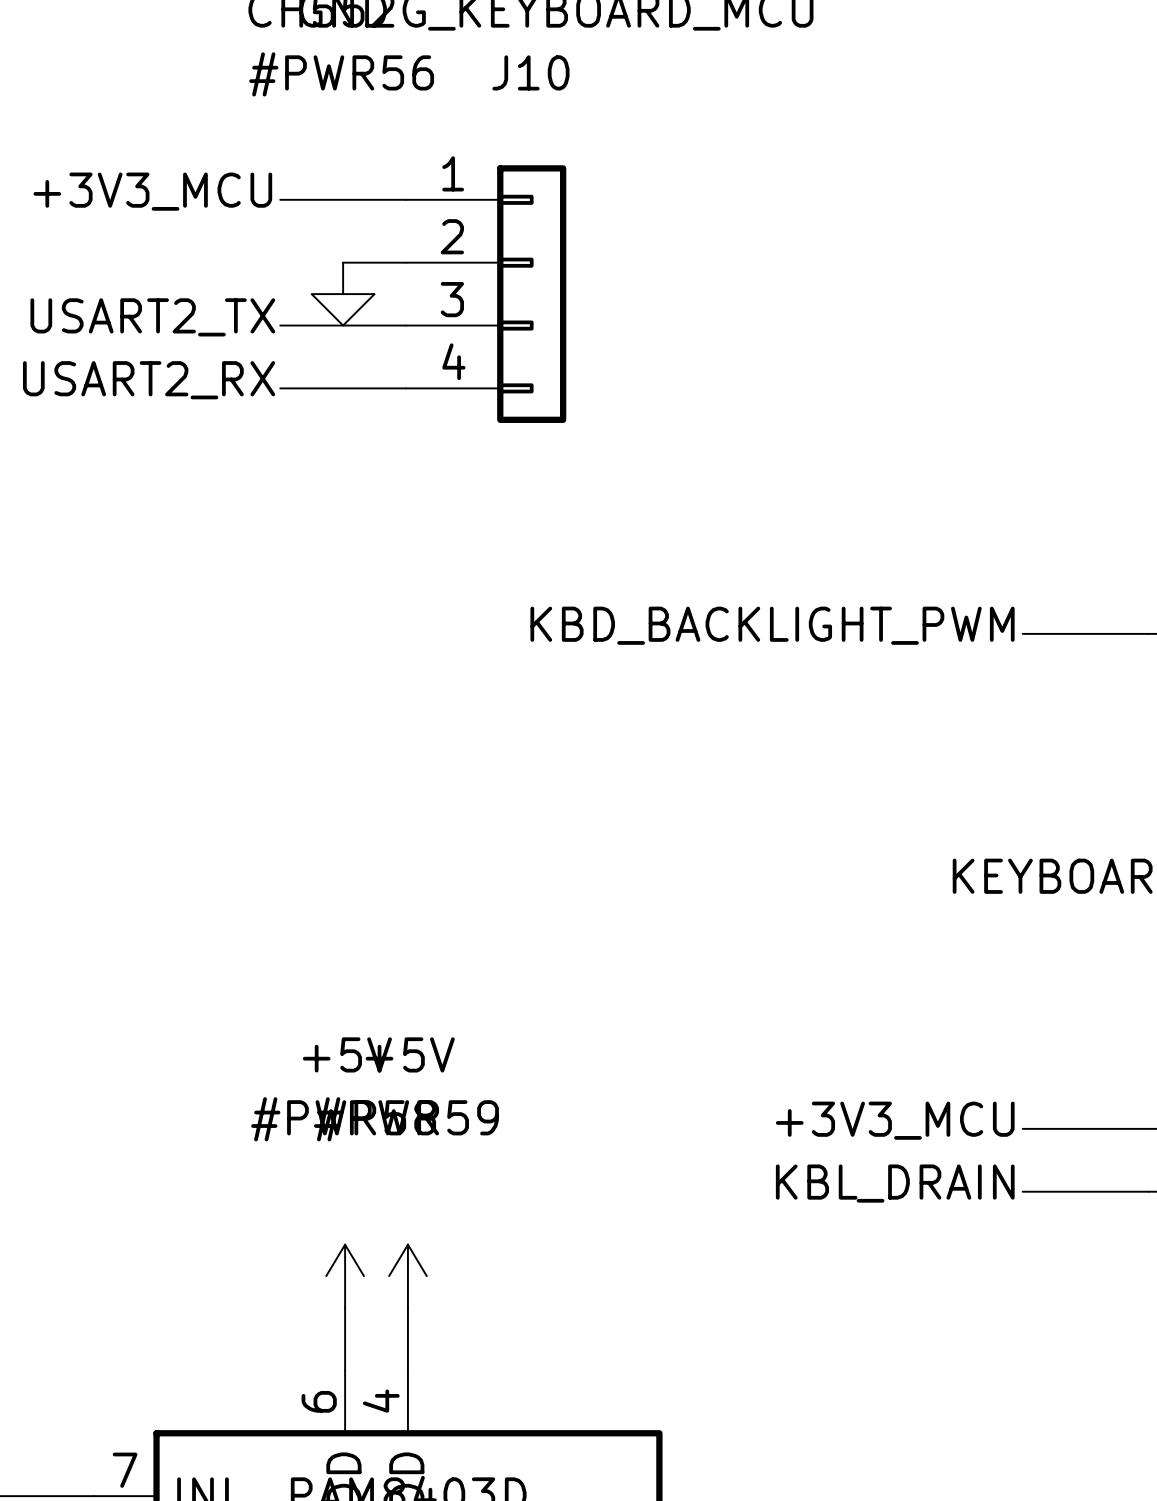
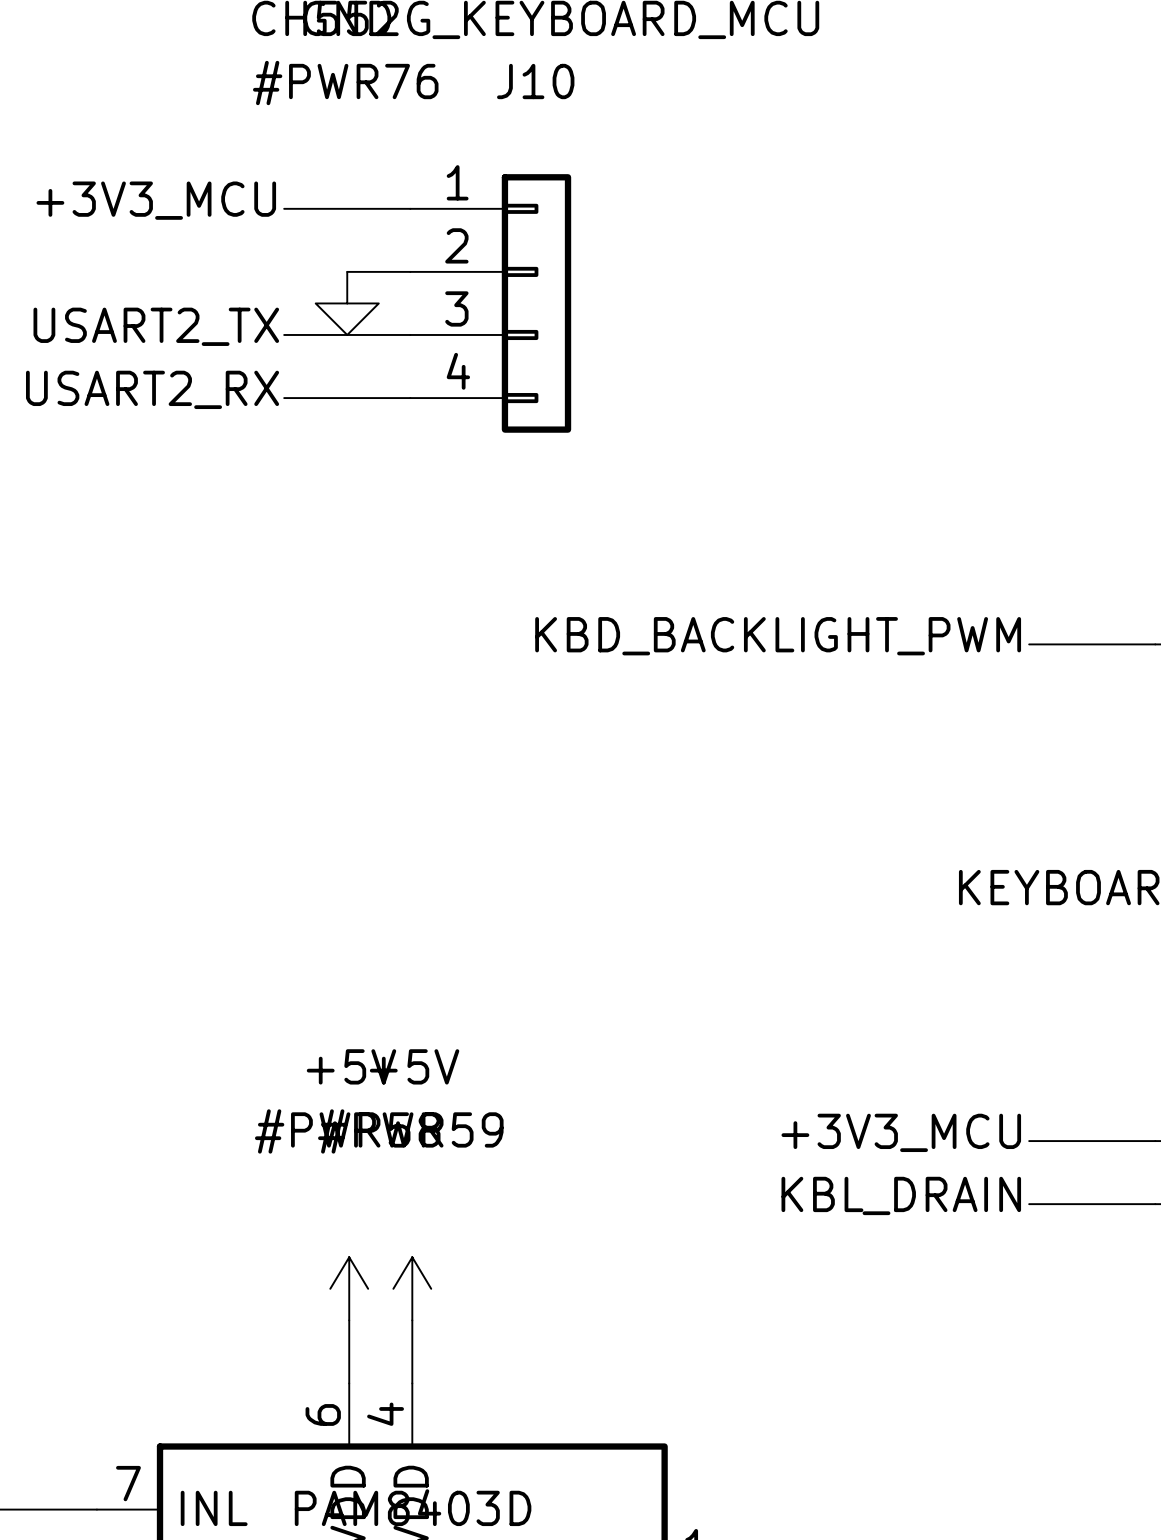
#PWR56 name: #PWR56 (341, 74) -> #PWR76 (345, 83)

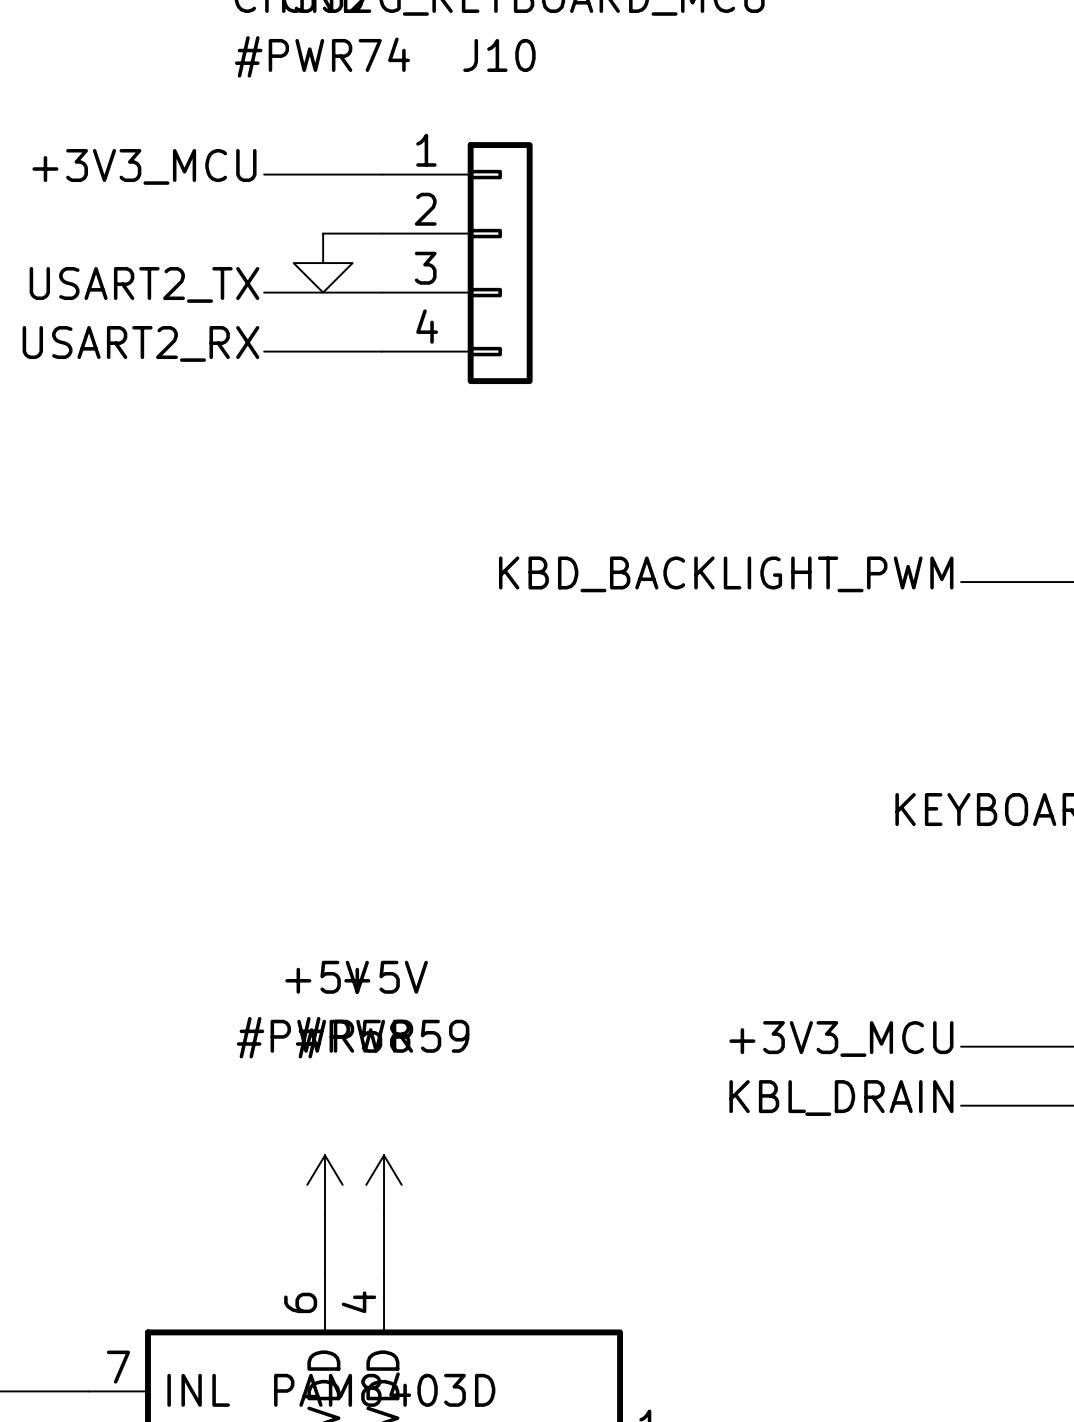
#PWR76 name: #PWR76 (345, 83) -> #PWR74 (322, 56)

